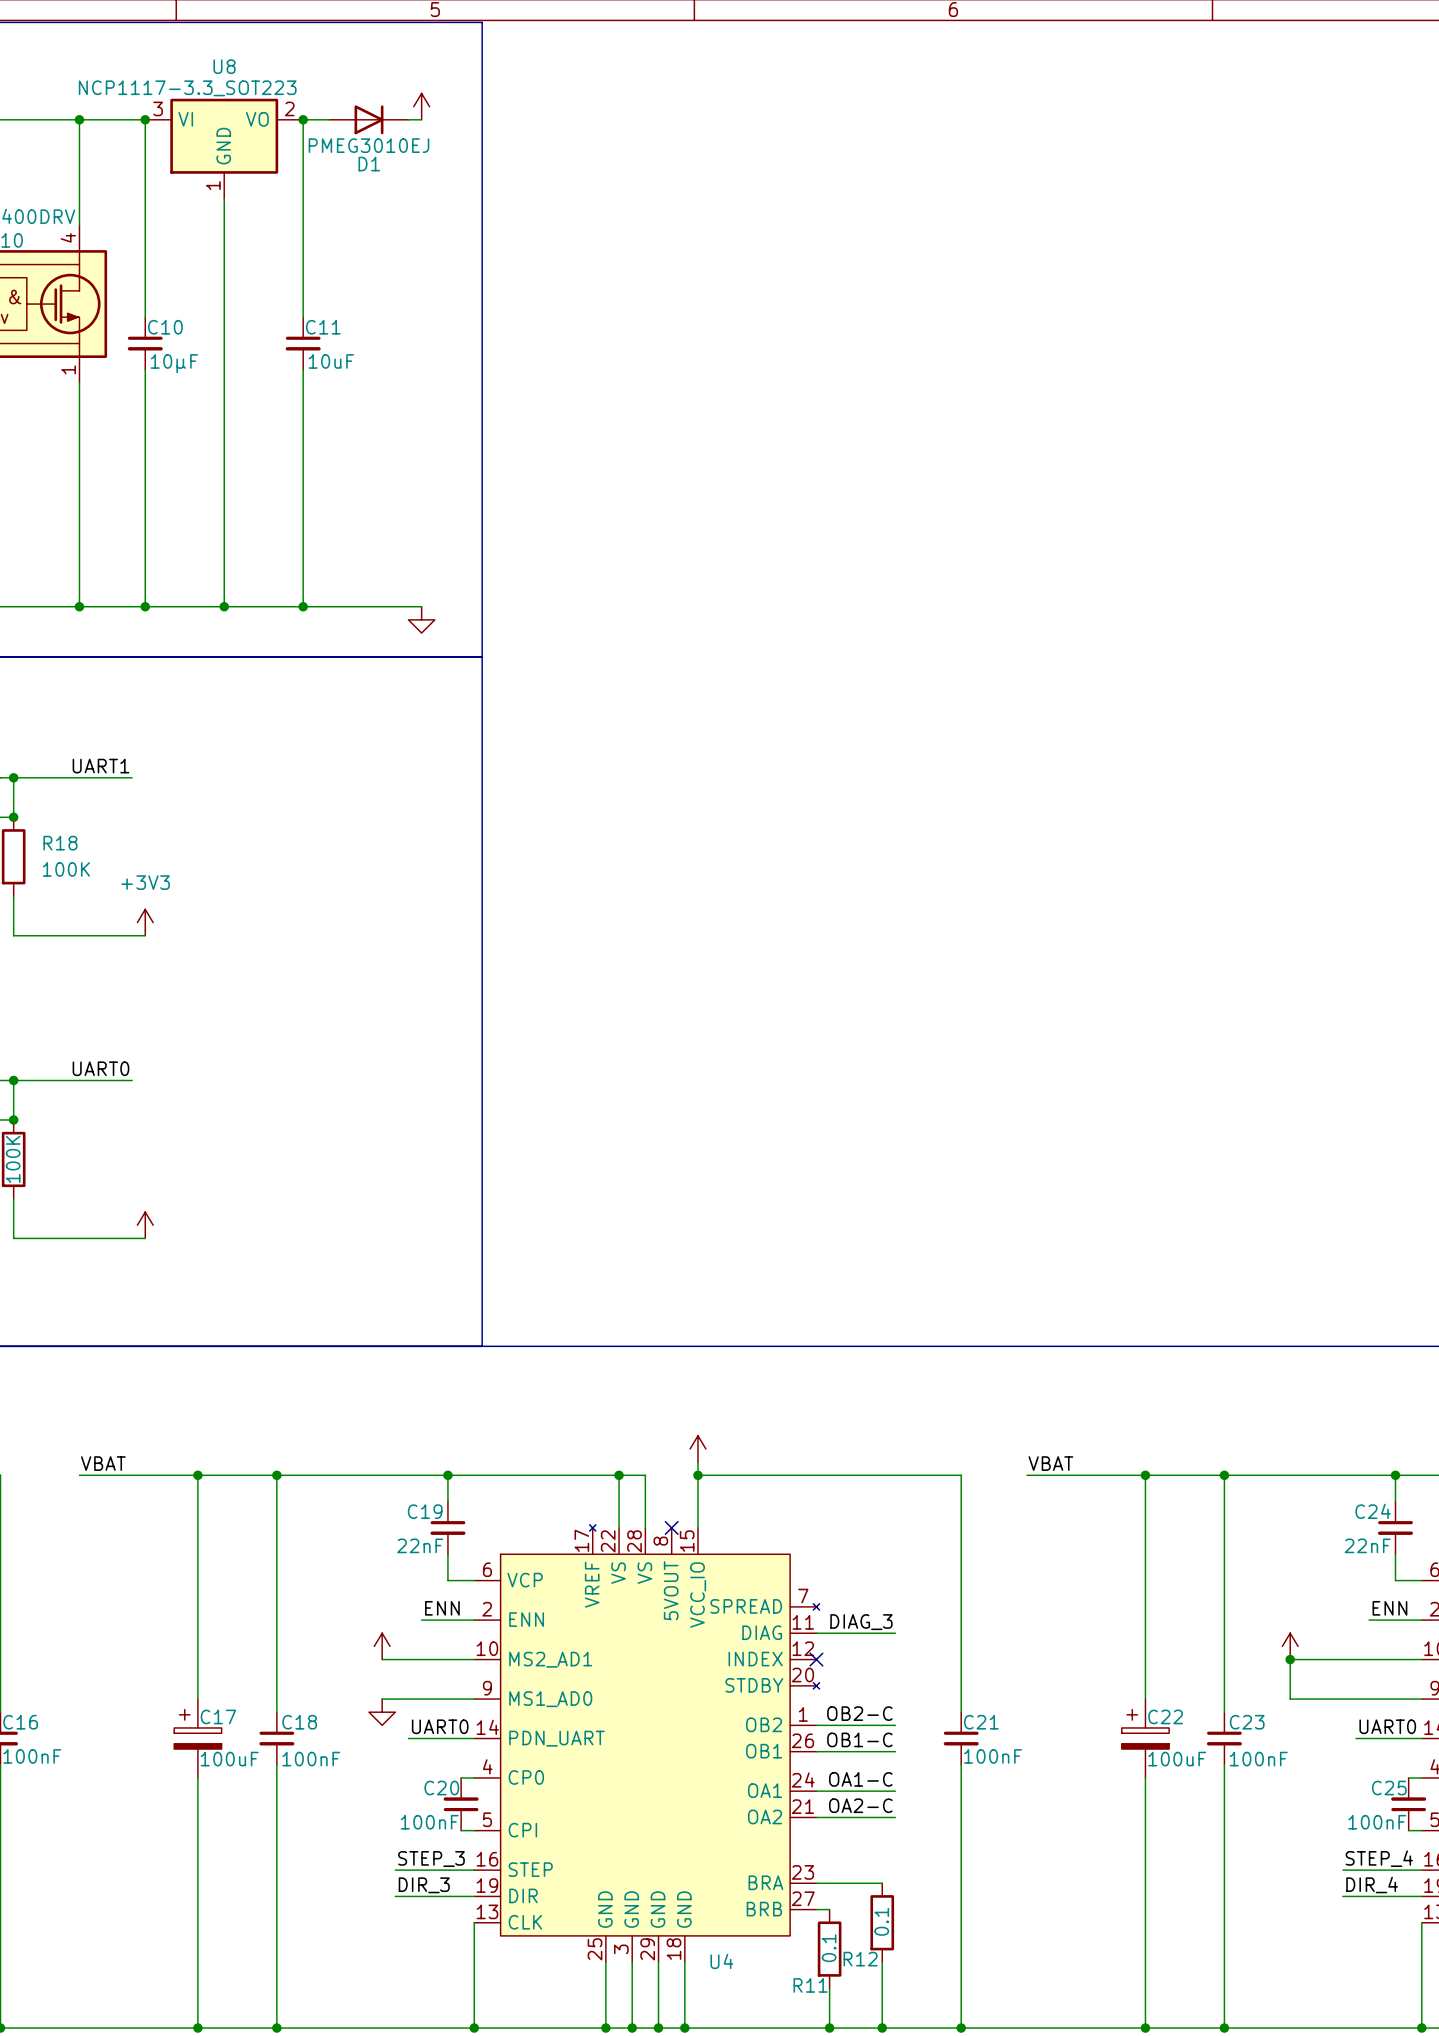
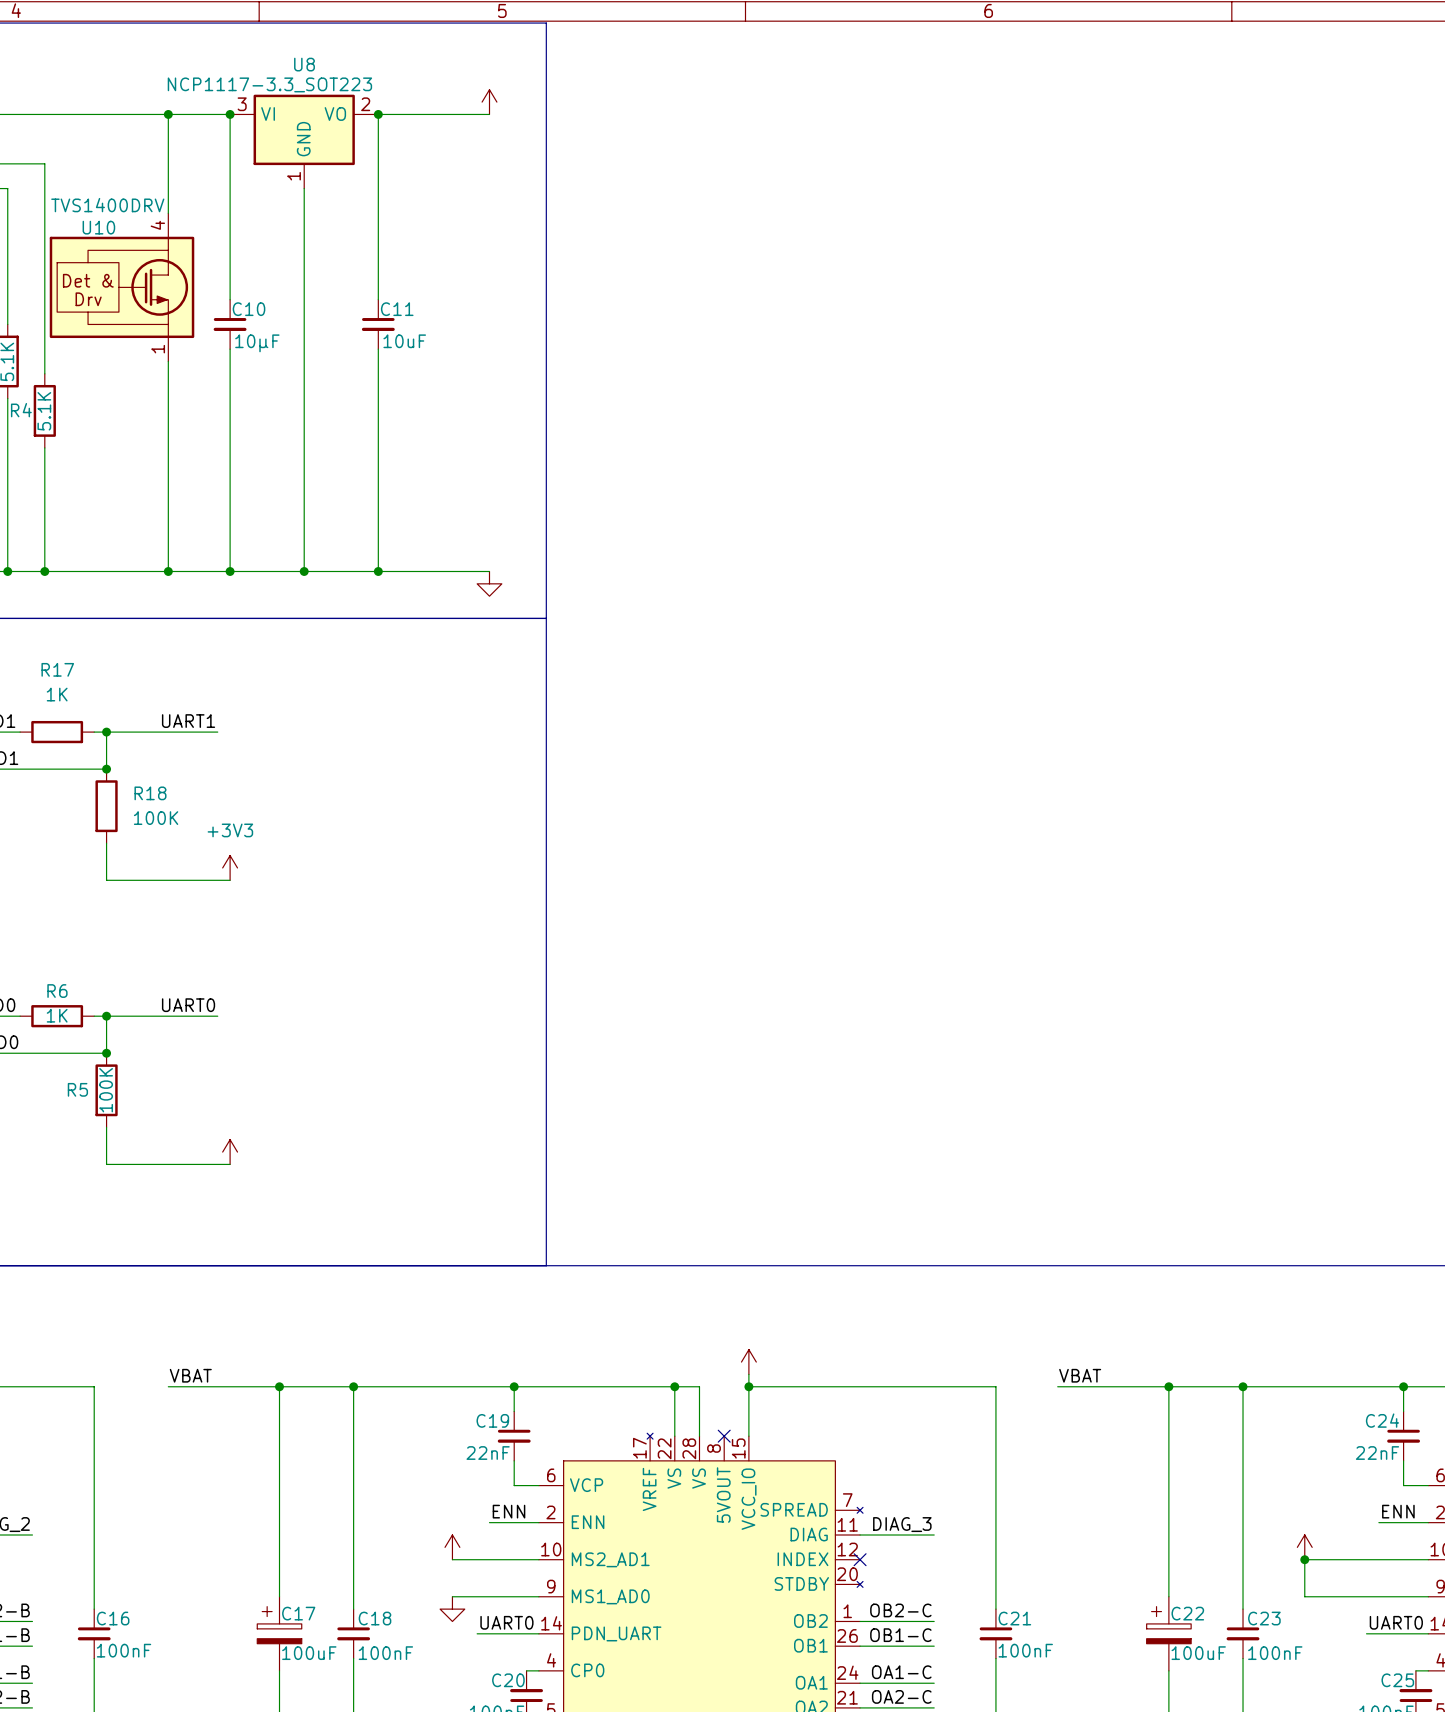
D1: PMEG3010EJ (368, 119) -> none

